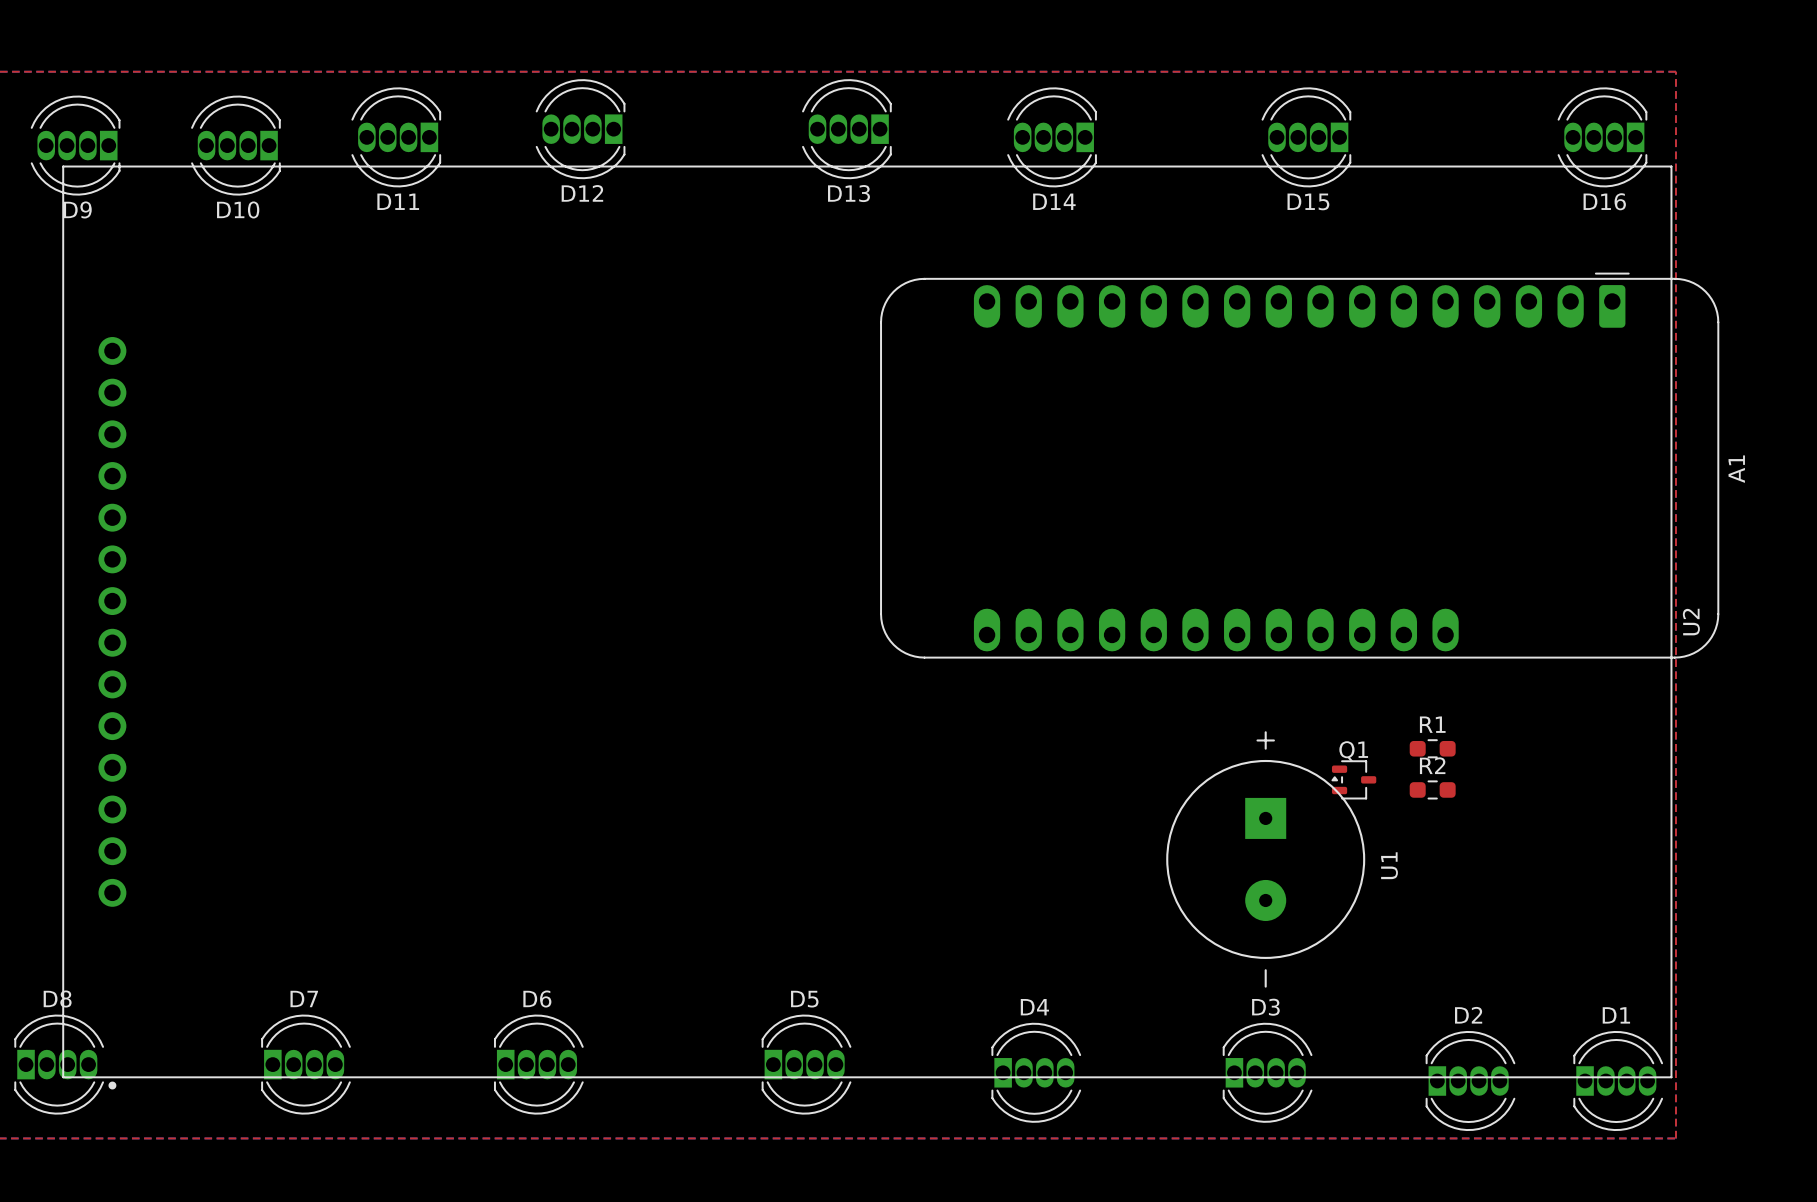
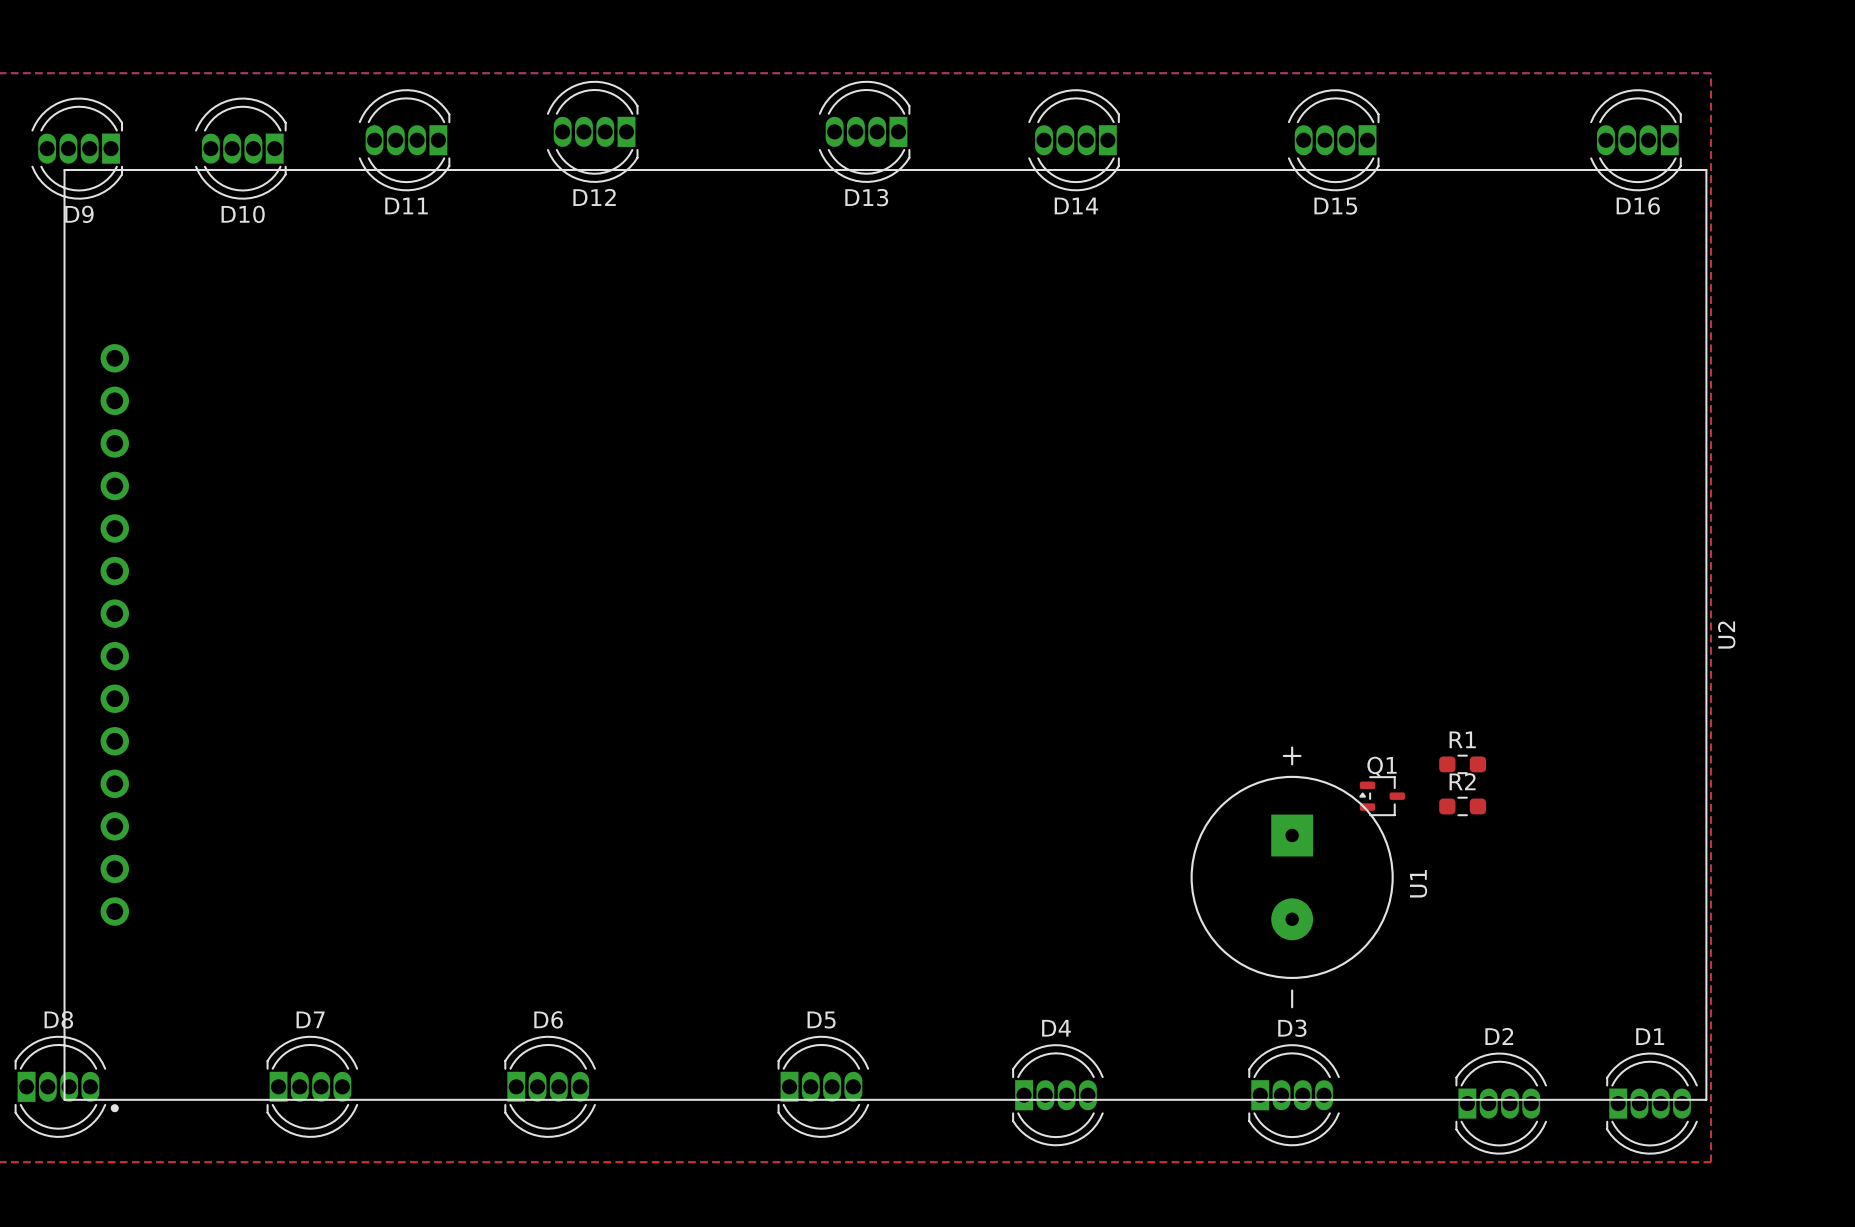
A1: (1299, 465) -> none

